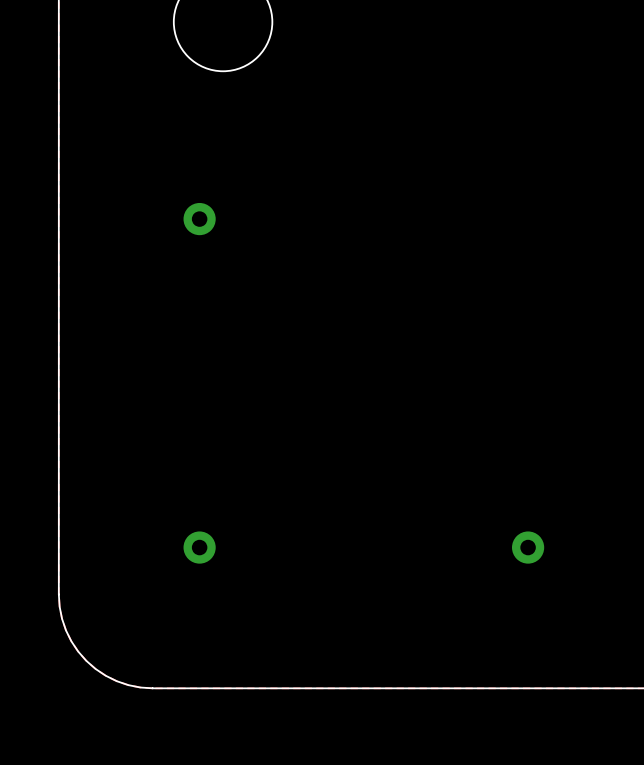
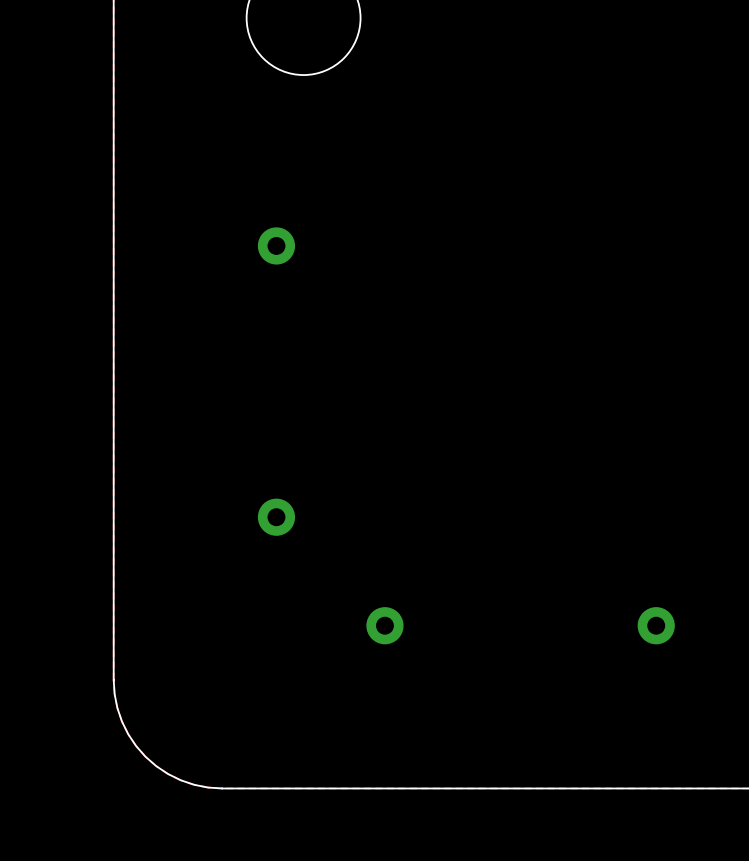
via: none -> (276, 517)
via: (199, 547) -> none
via: none -> (384, 625)

